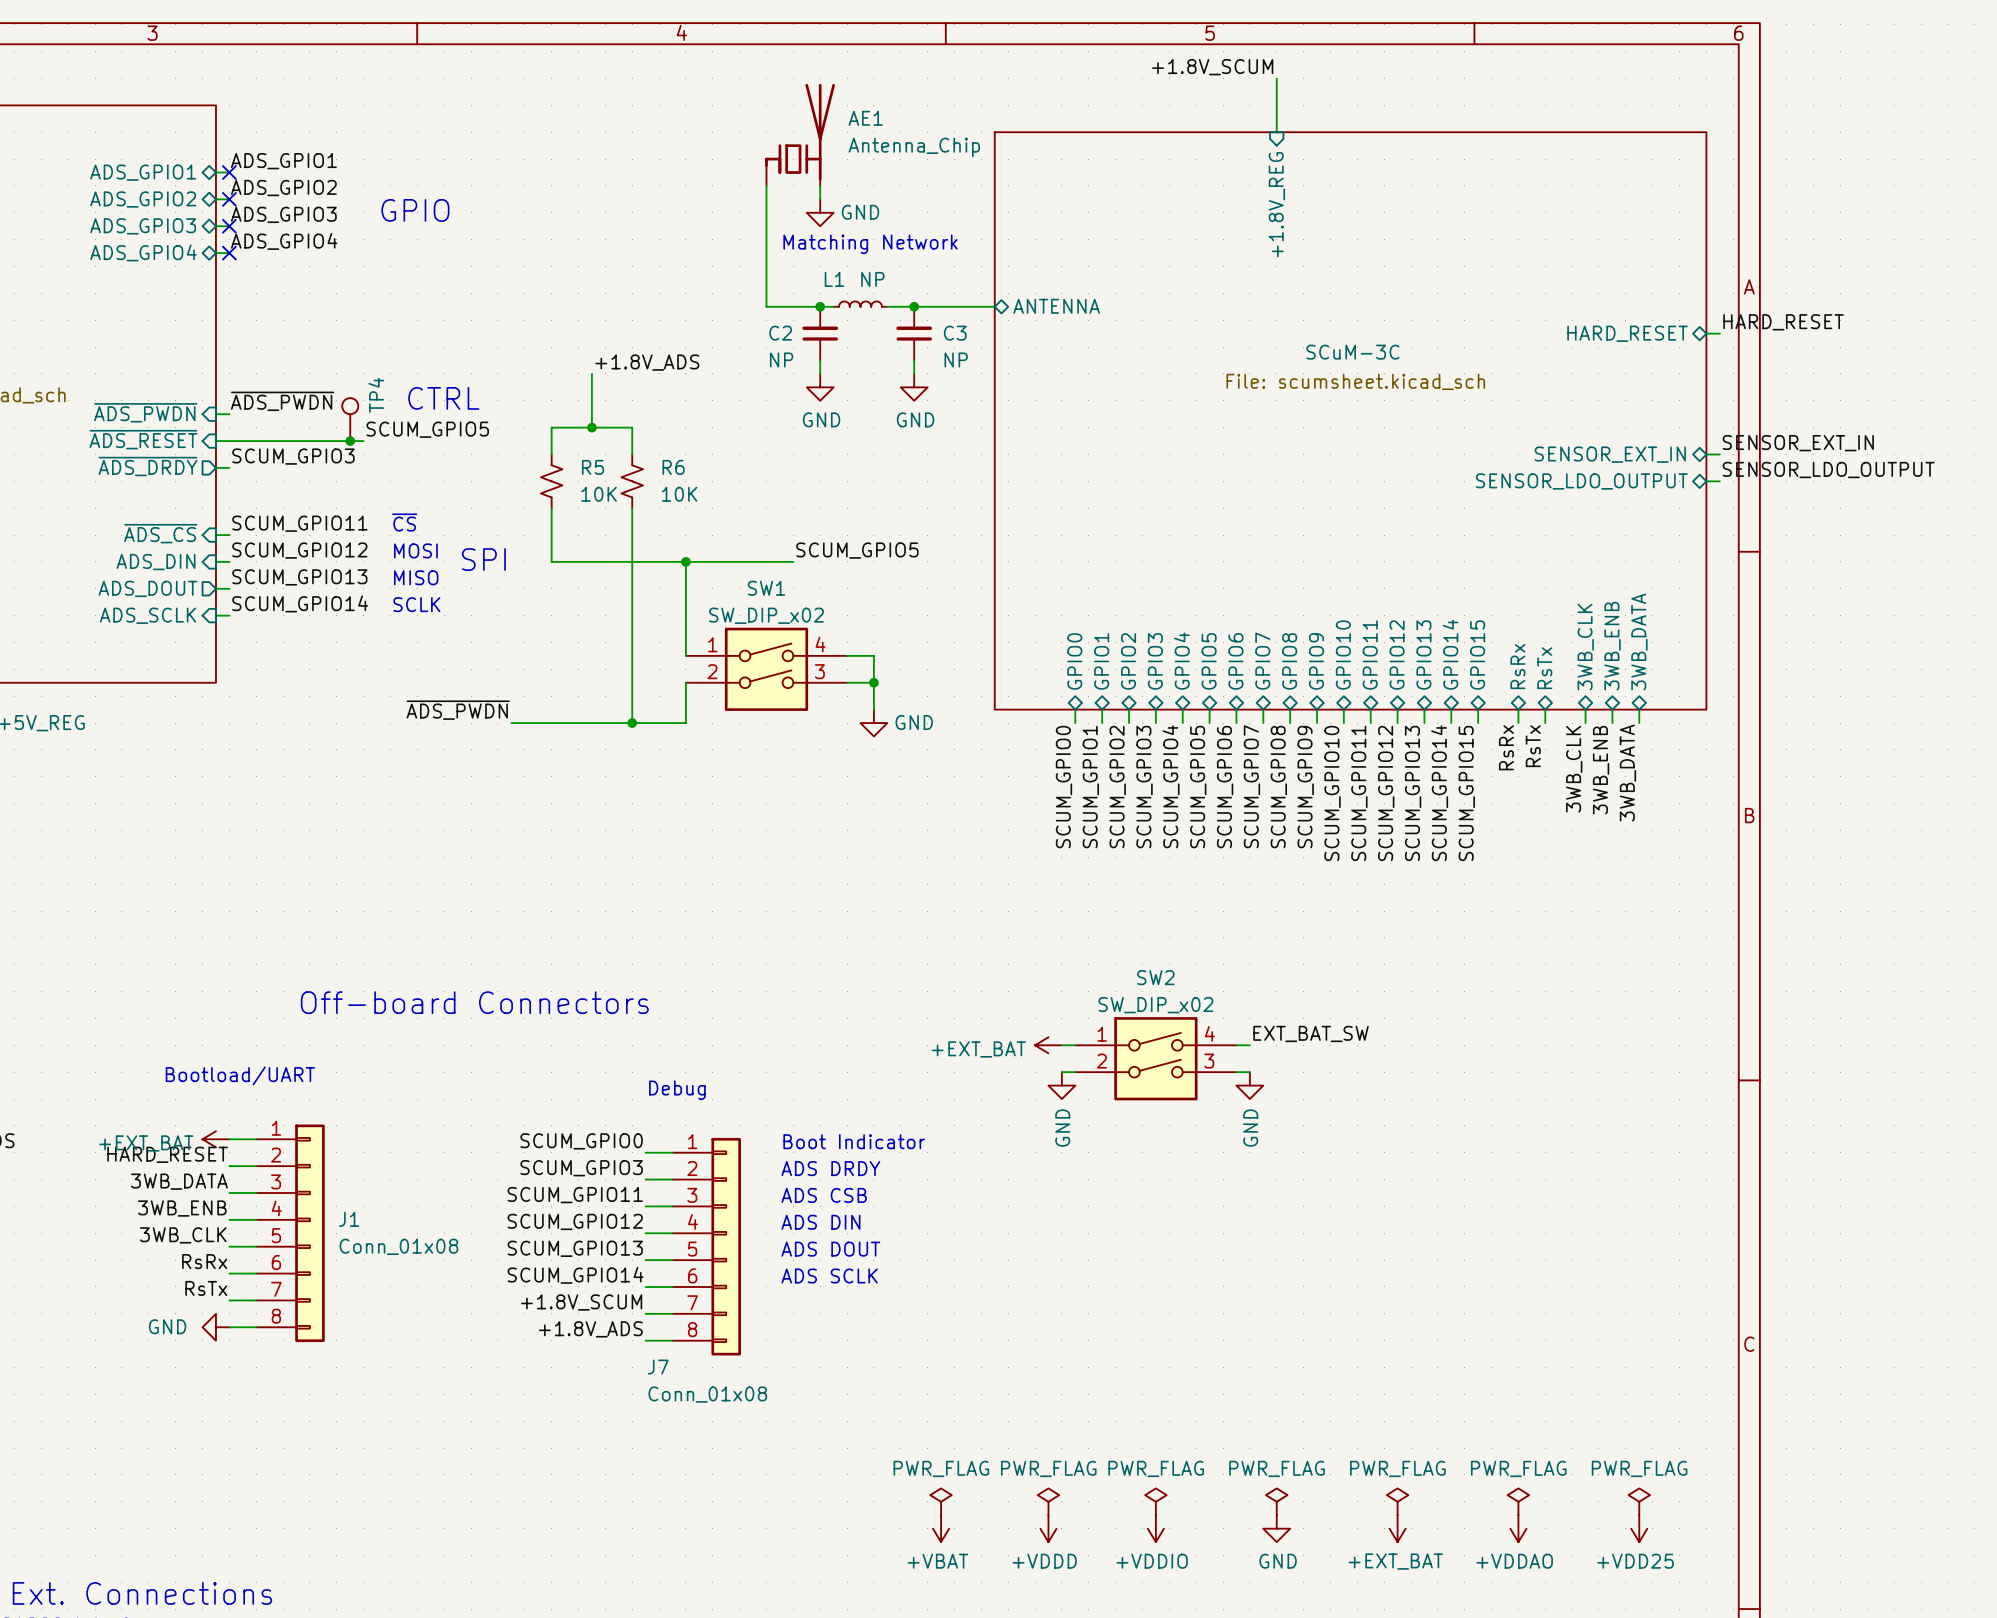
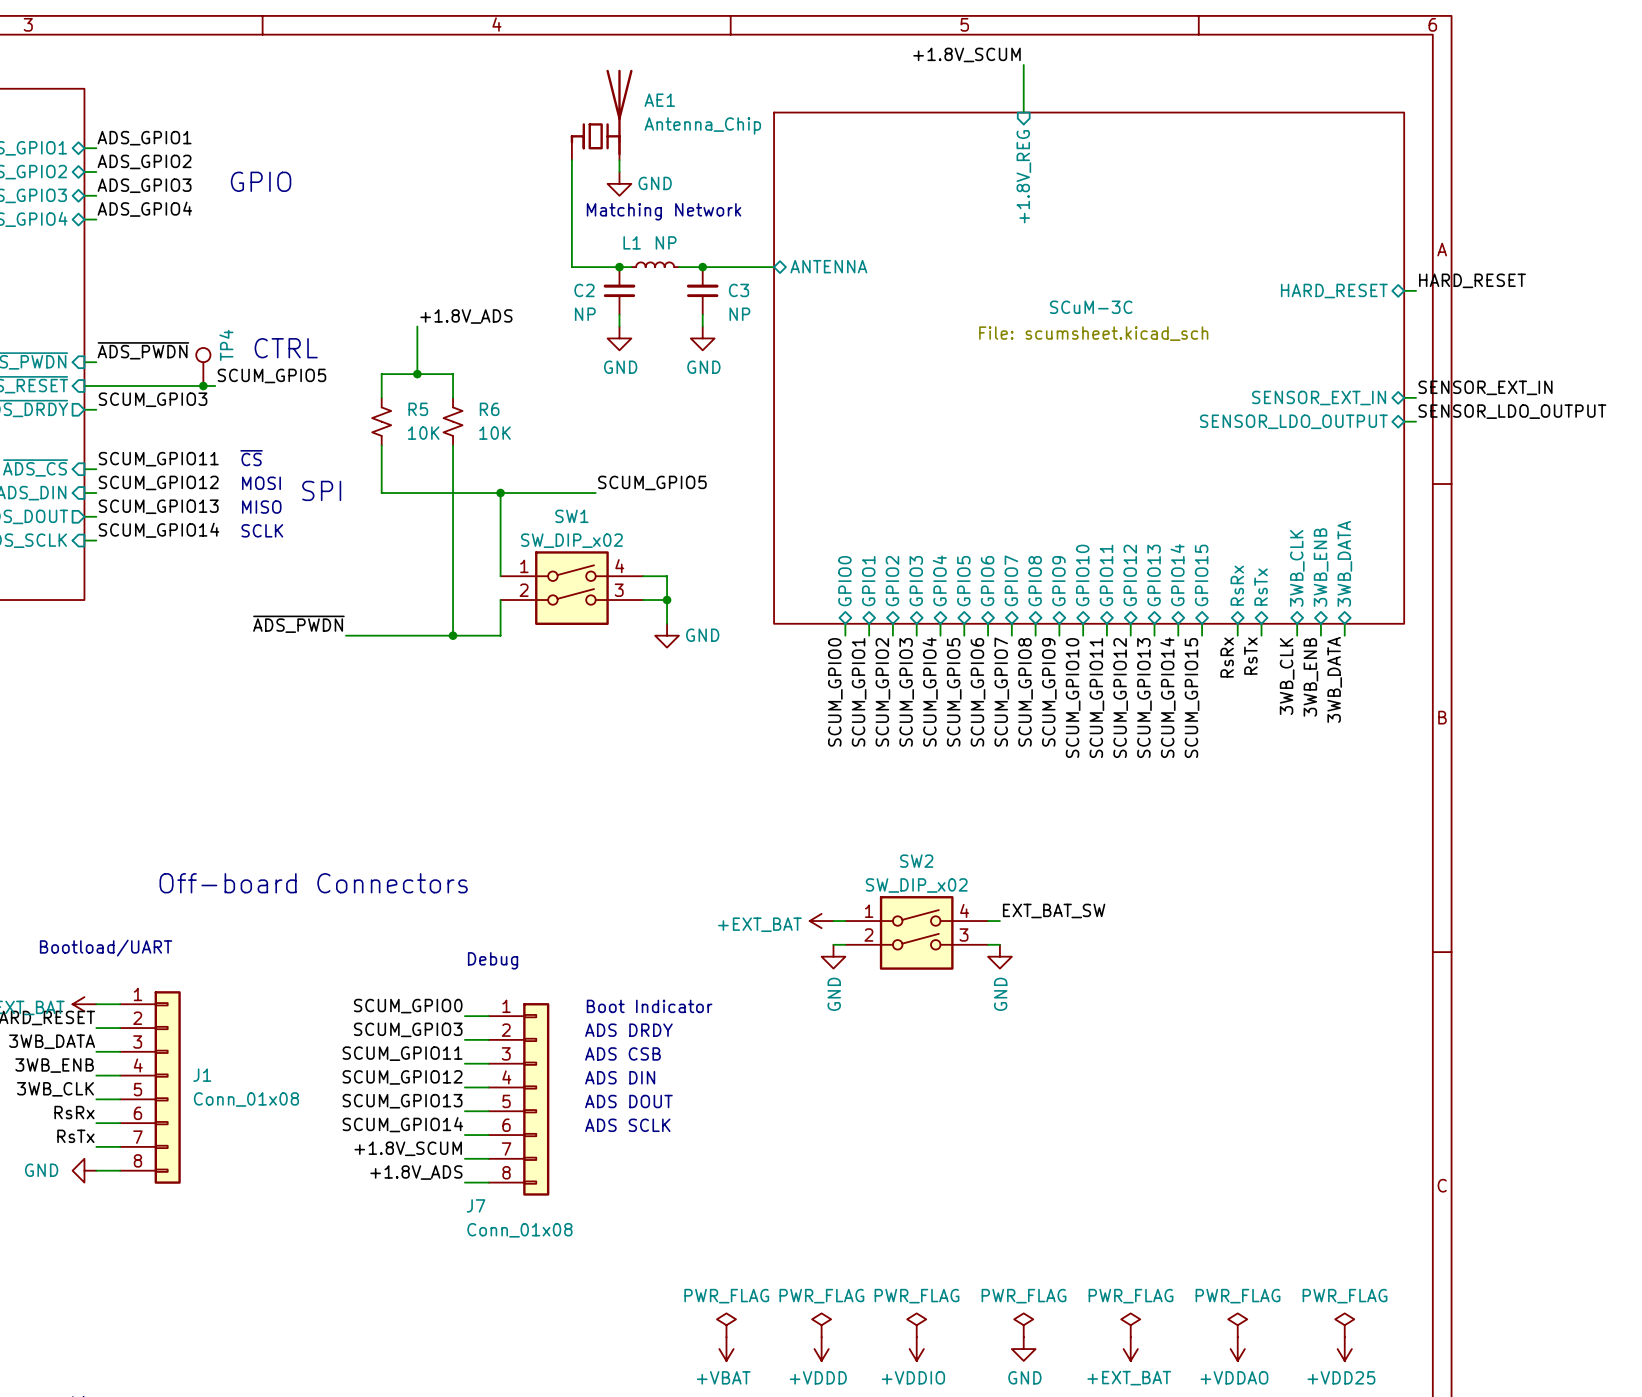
no-connect mark: (229, 172) -> none
no-connect mark: (229, 199) -> none
no-connect mark: (229, 226) -> none
no-connect mark: (229, 253) -> none

